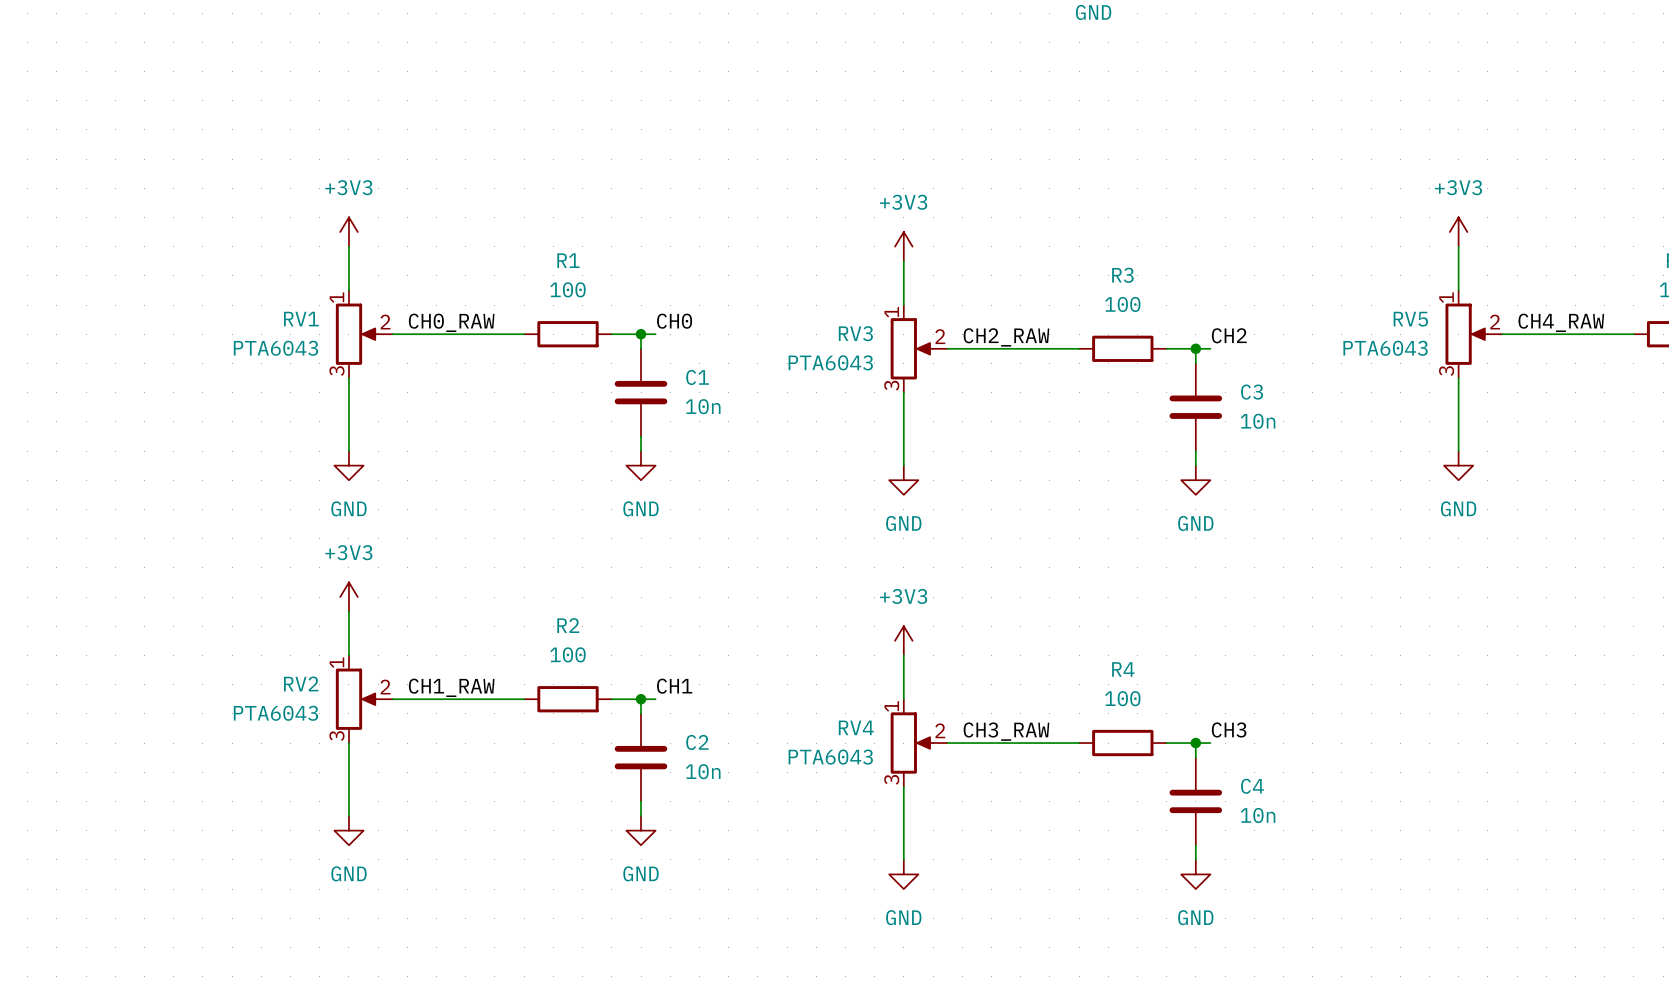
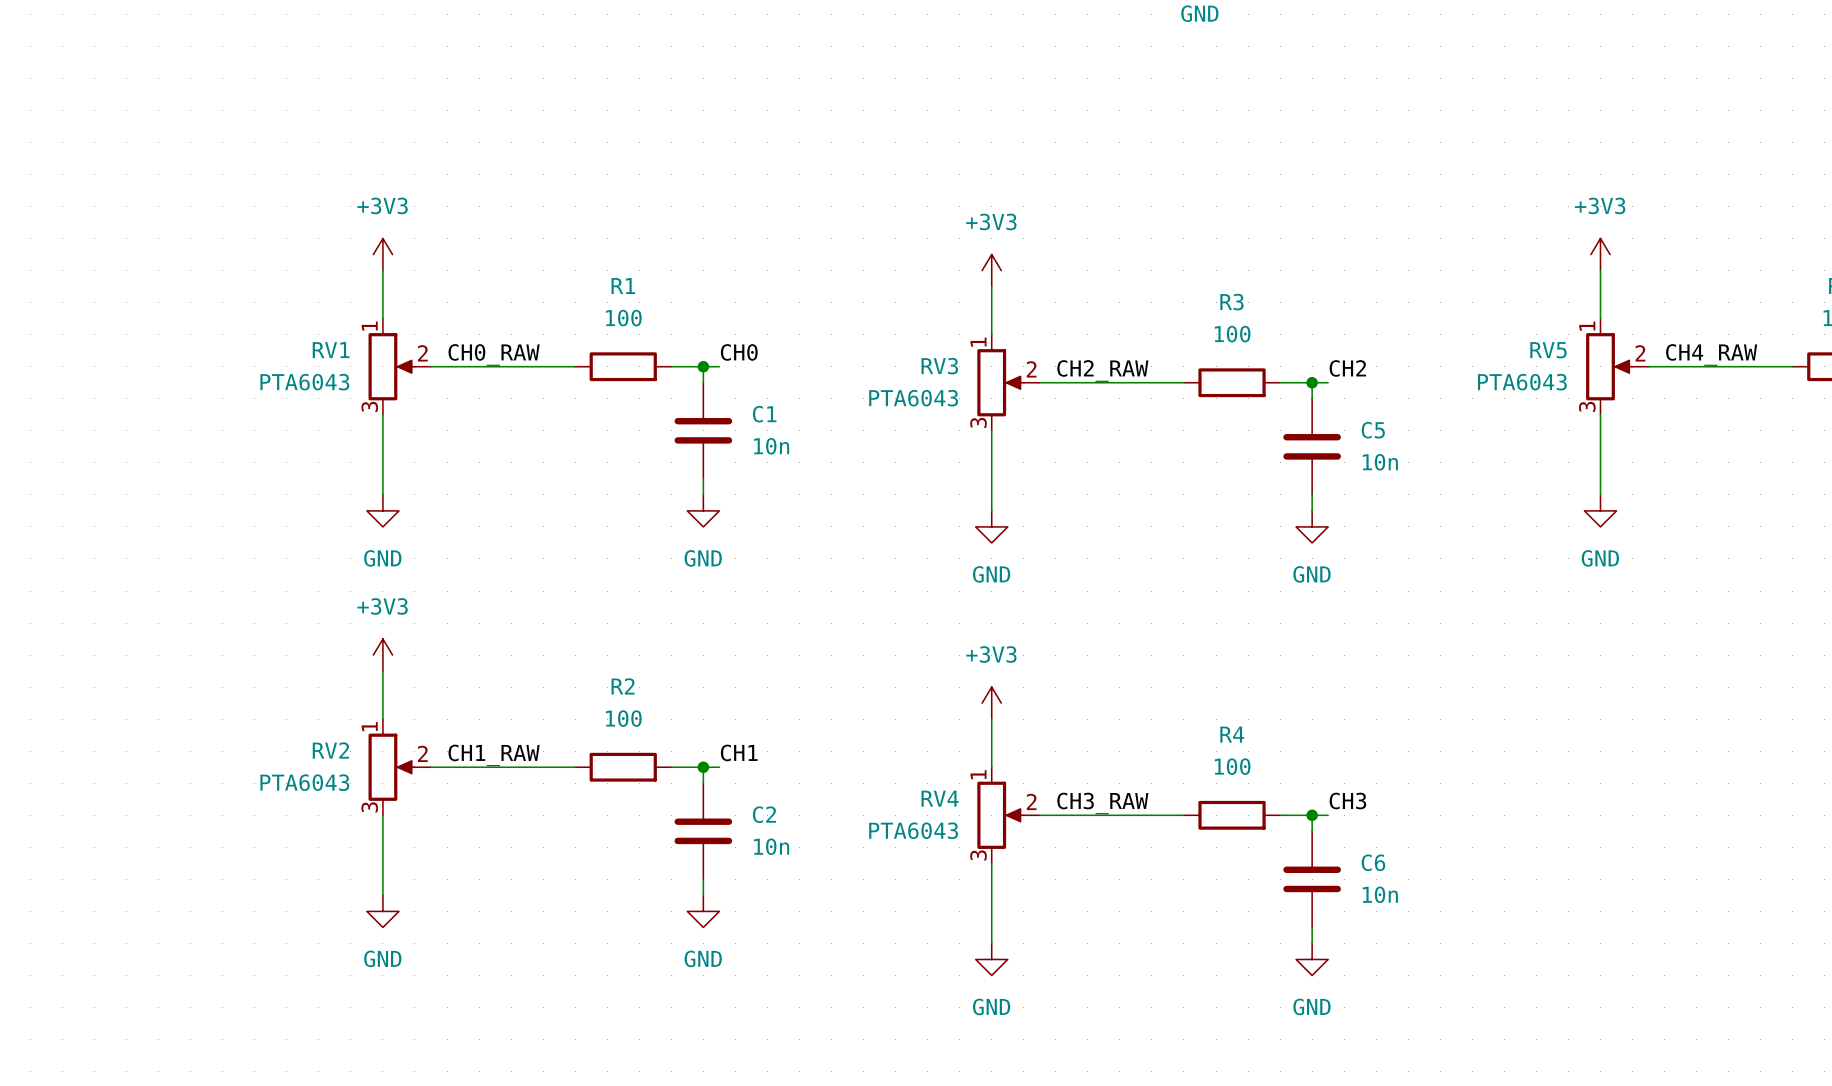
C3 name: C3 (1252, 392) -> C5 (1373, 430)
C4 name: C4 (1252, 786) -> C6 (1373, 862)

